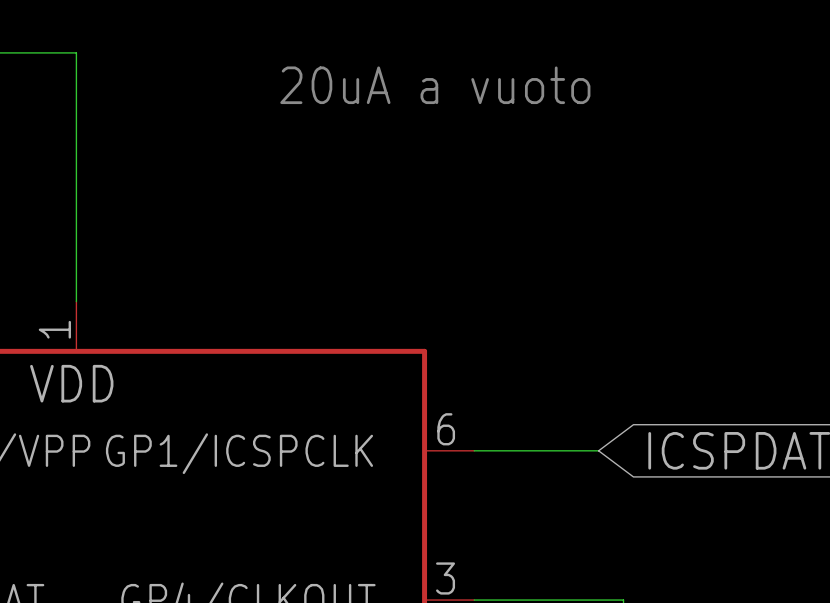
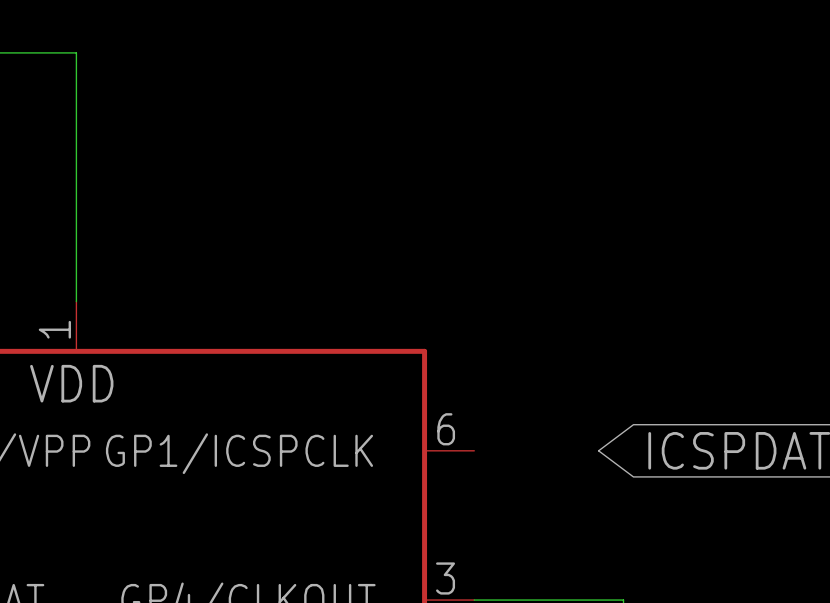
text: 20uA a vuoto (435, 85) -> none
wire: (474, 450) (598, 450) -> none

